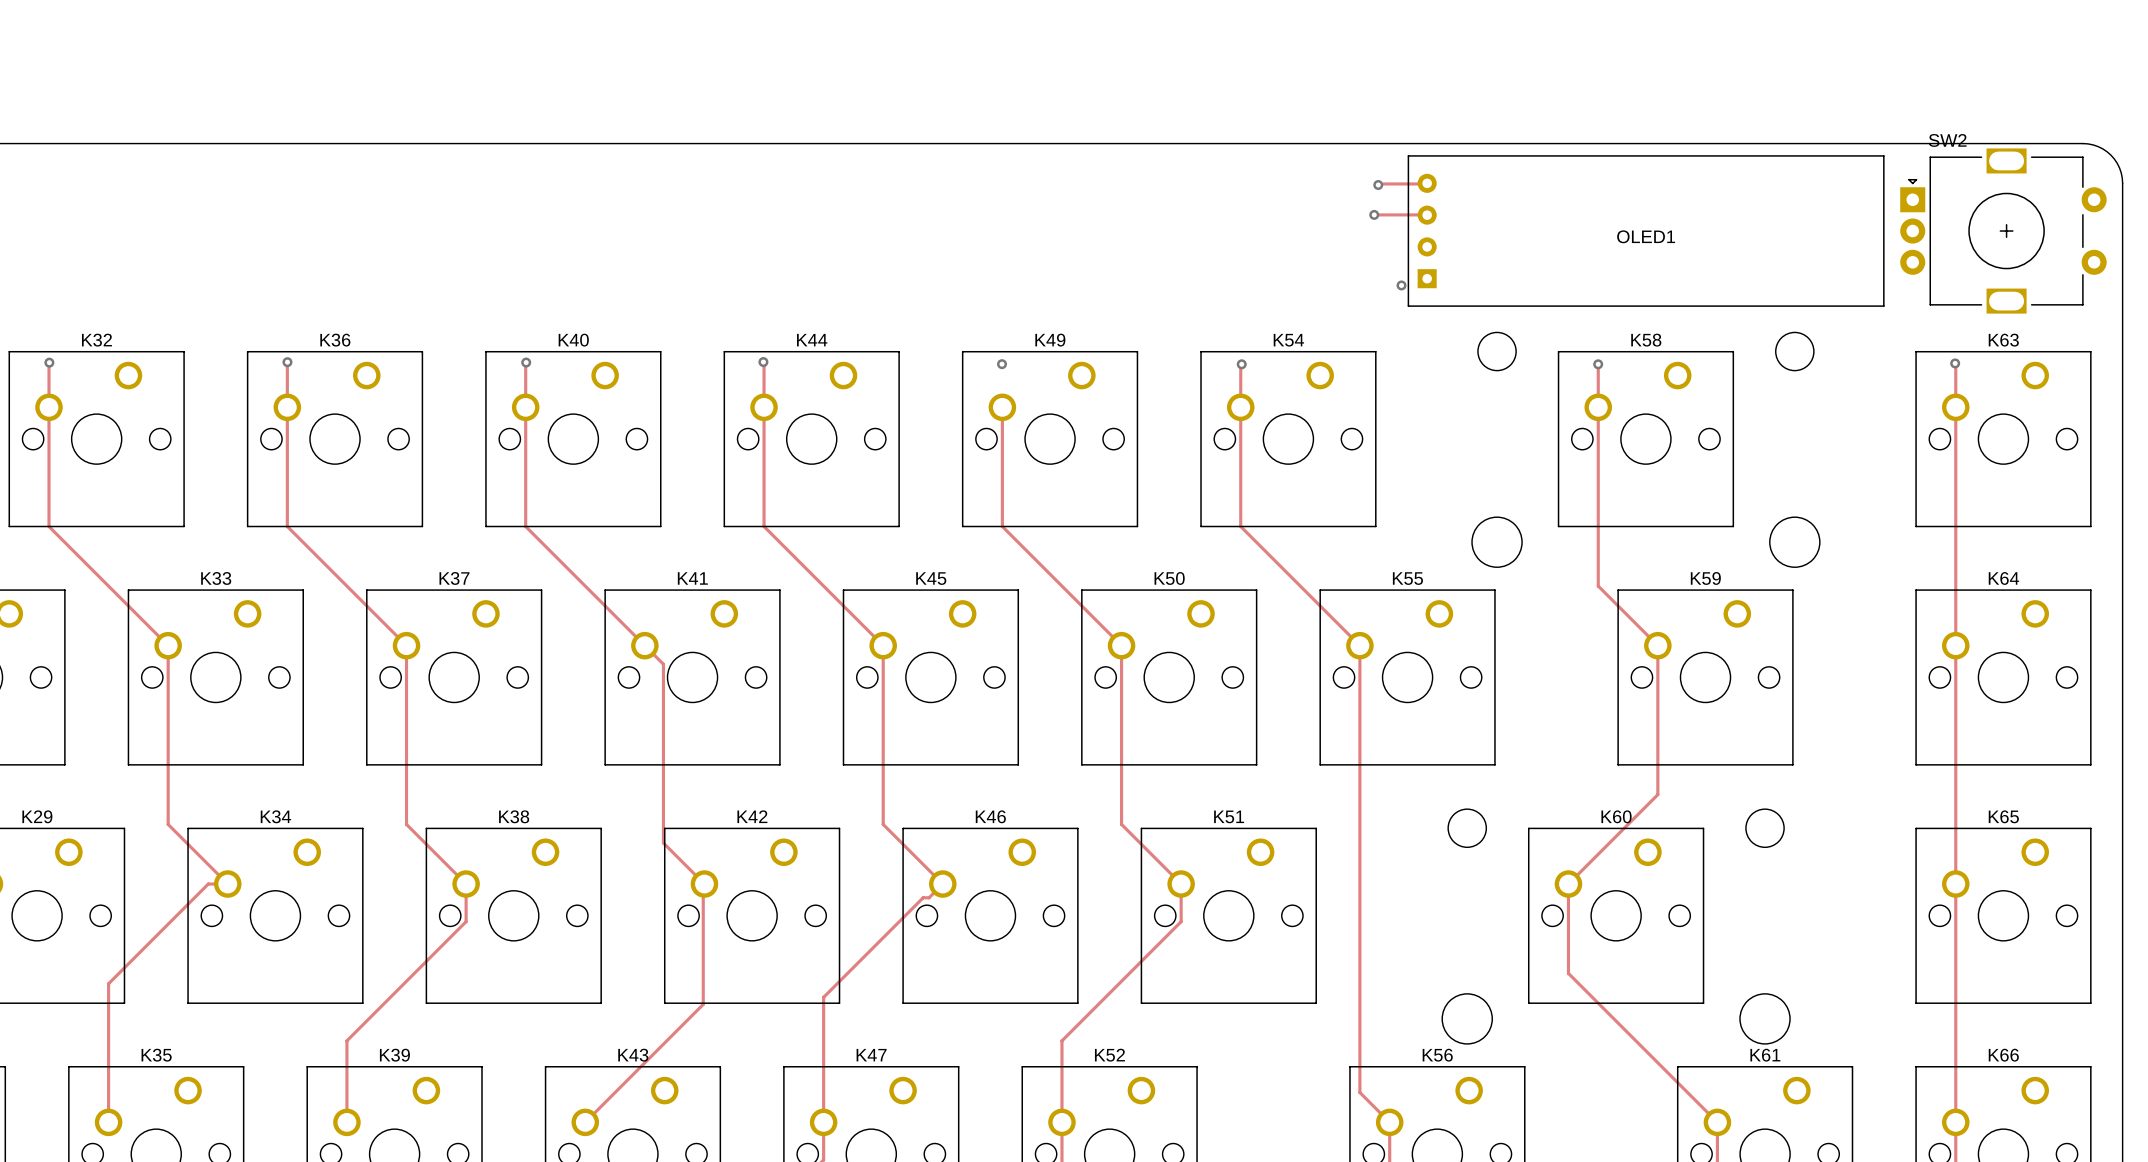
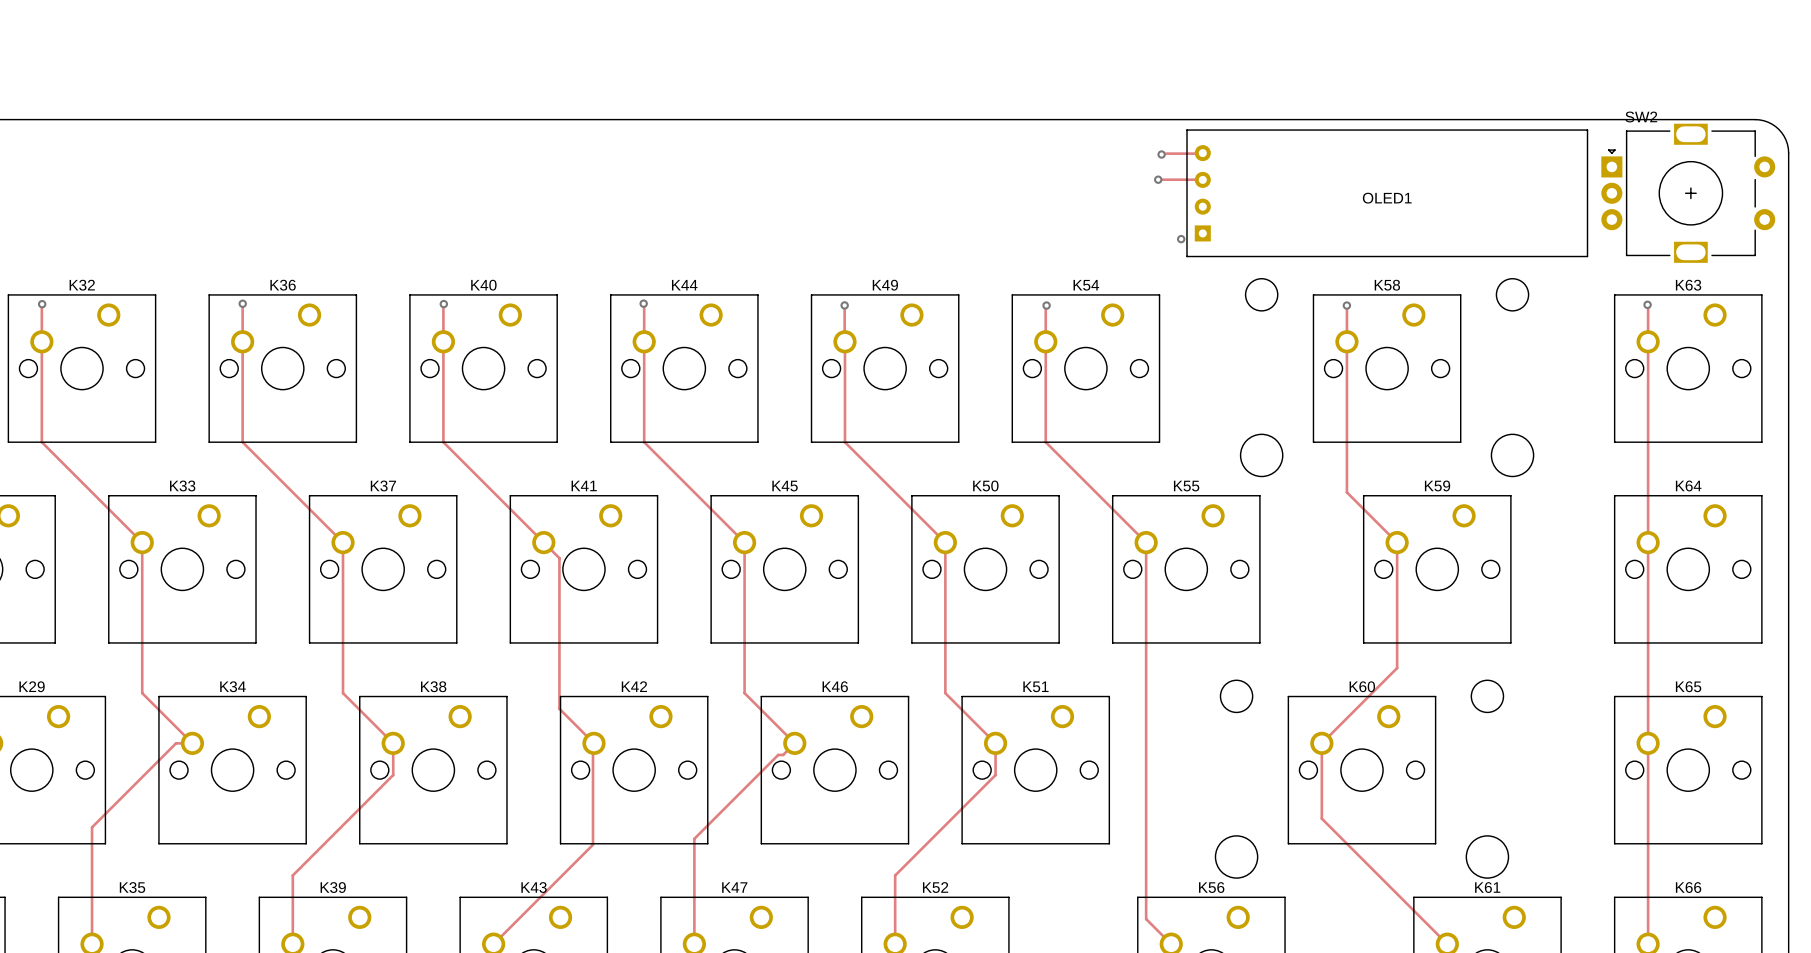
track: none -> (844, 305) (844, 341)

